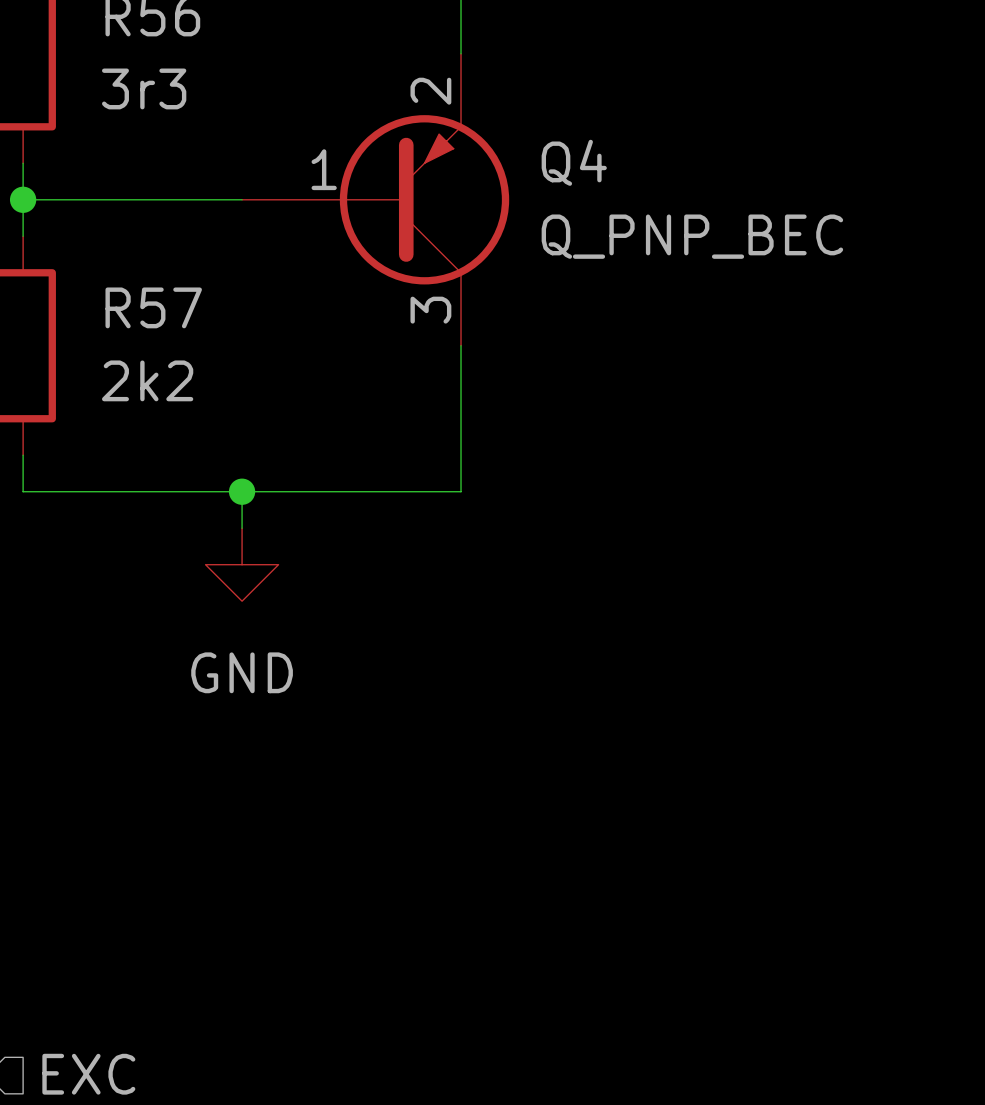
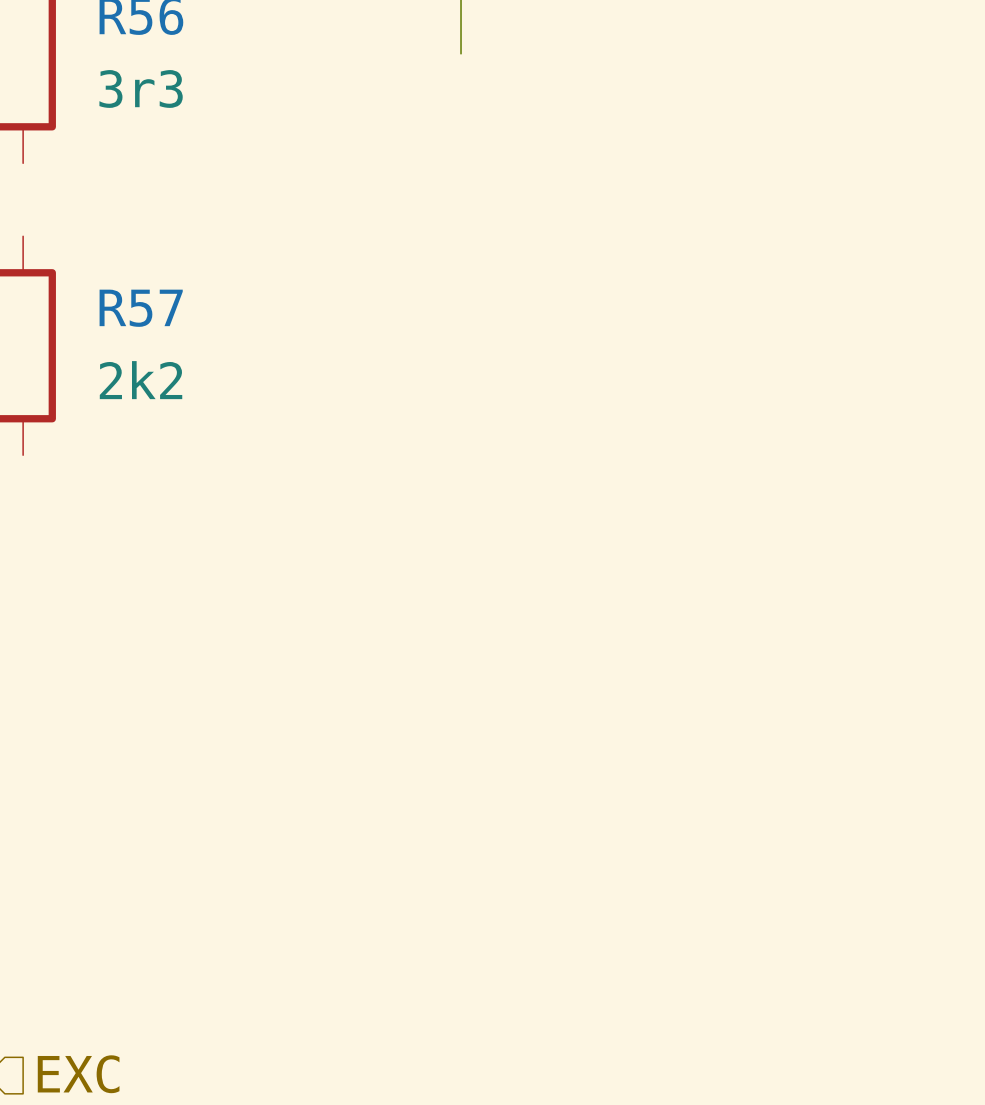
wire: (23, 163) (23, 236) -> none
wire: (23, 199) (242, 199) -> none
junction: (23, 199) -> none
Q4: Q_PNP_BEC (375, 199) -> none
wire: (461, 345) (461, 491) (23, 491) (23, 455) -> none
wire: (242, 491) (242, 528) -> none
junction: (242, 491) -> none
power symbol: GND (242, 564) -> none

